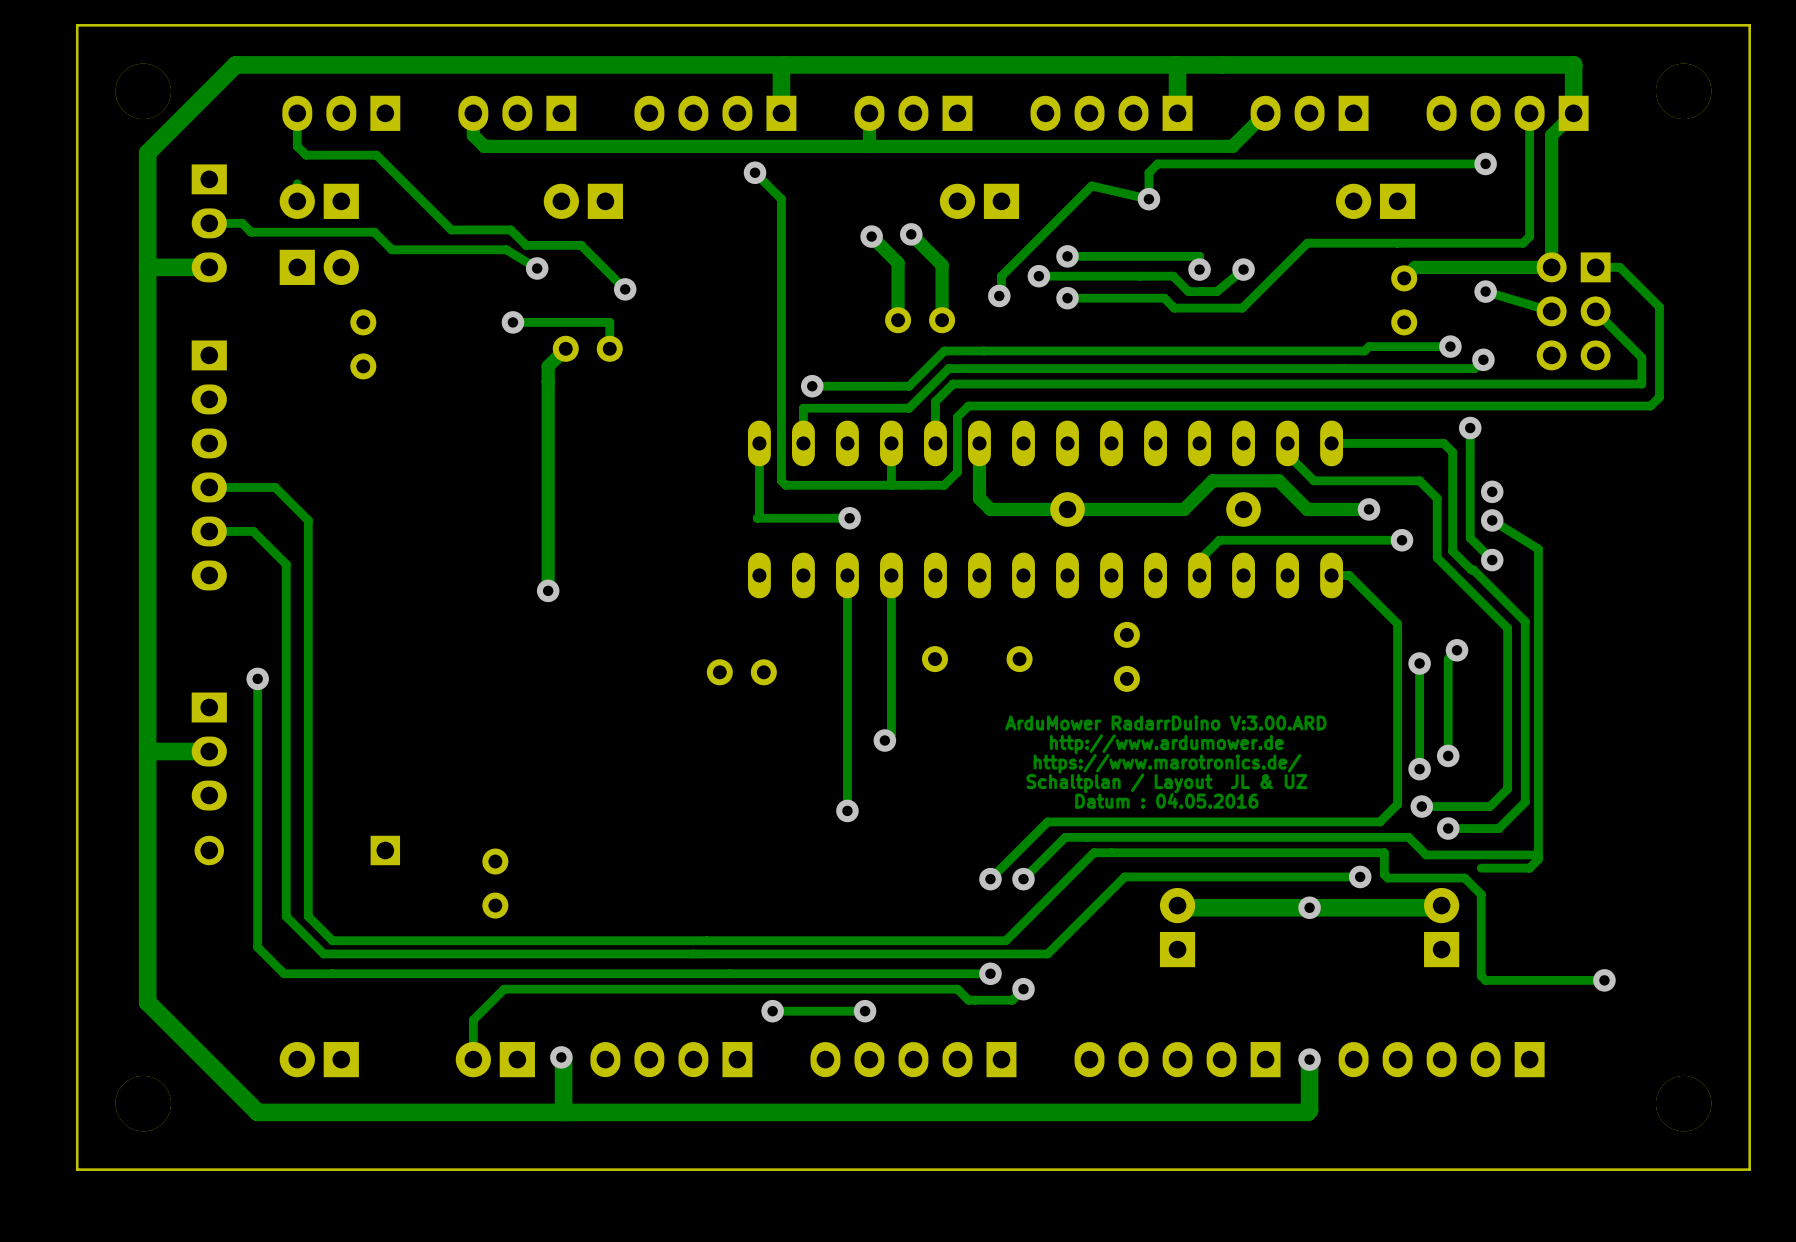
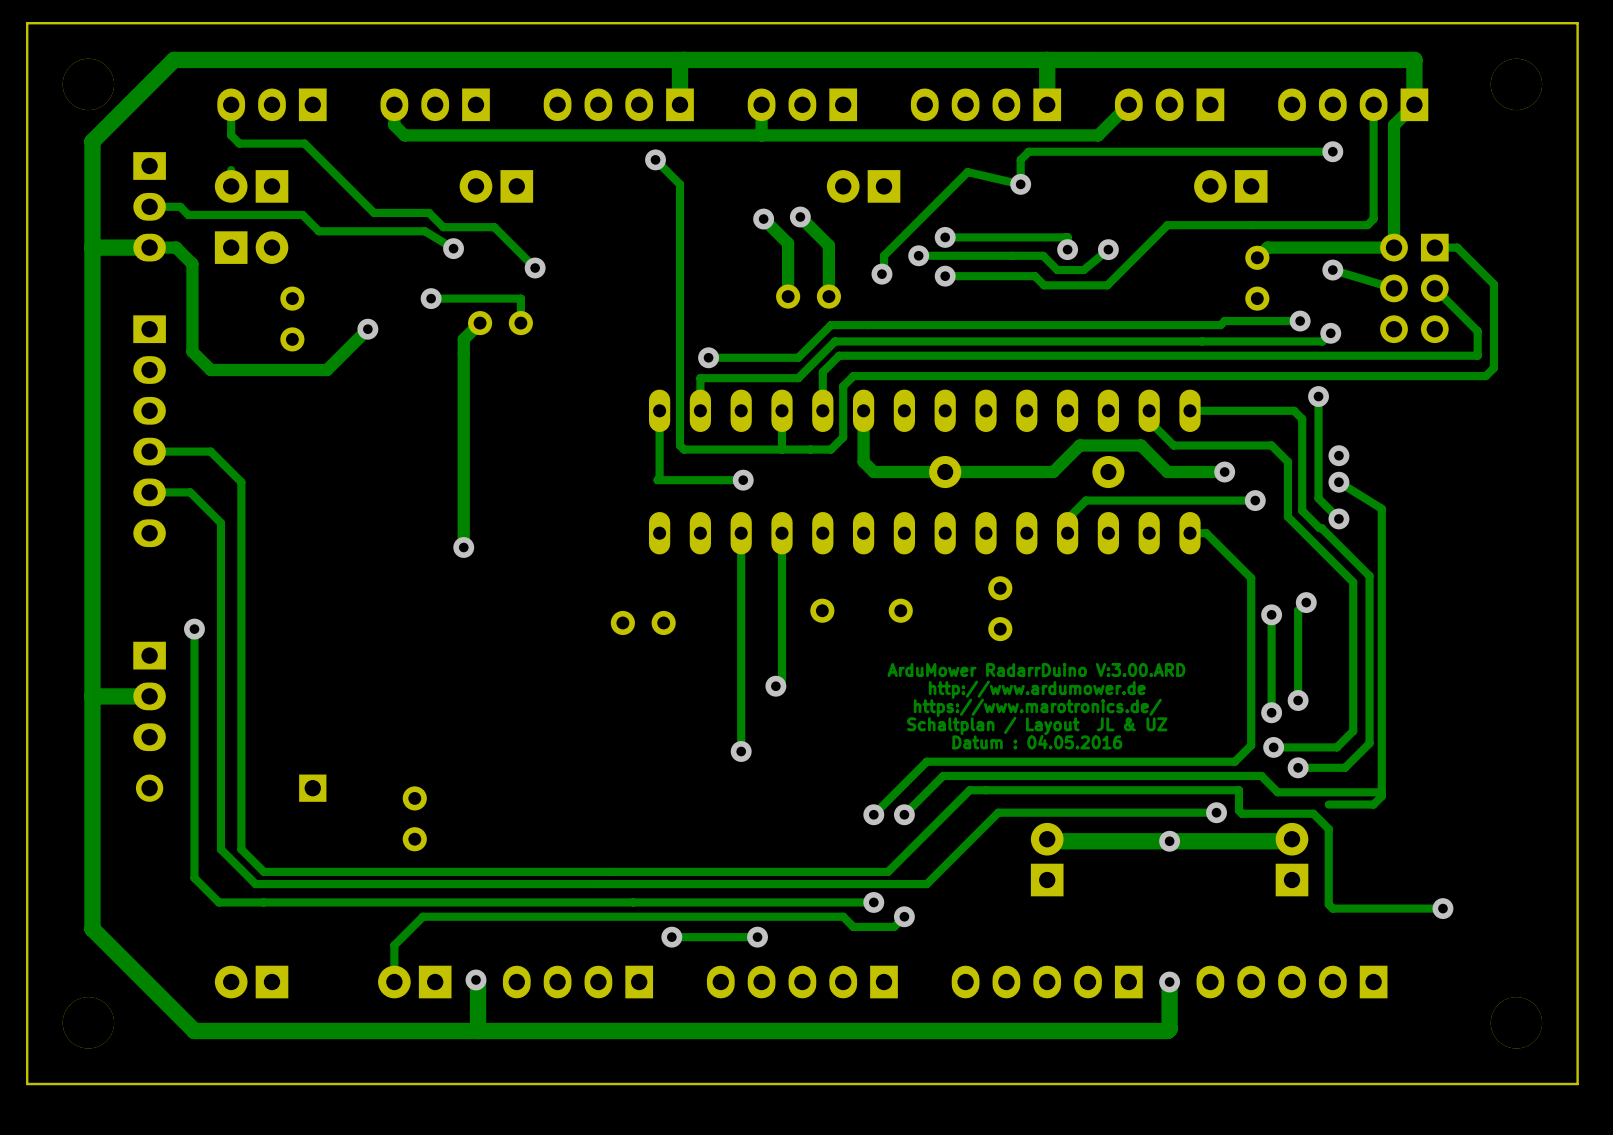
track: none -> (149, 247) (176, 247) (192, 263) (192, 351) (210, 370) (327, 370) (367, 329)
via: none -> (367, 329)

